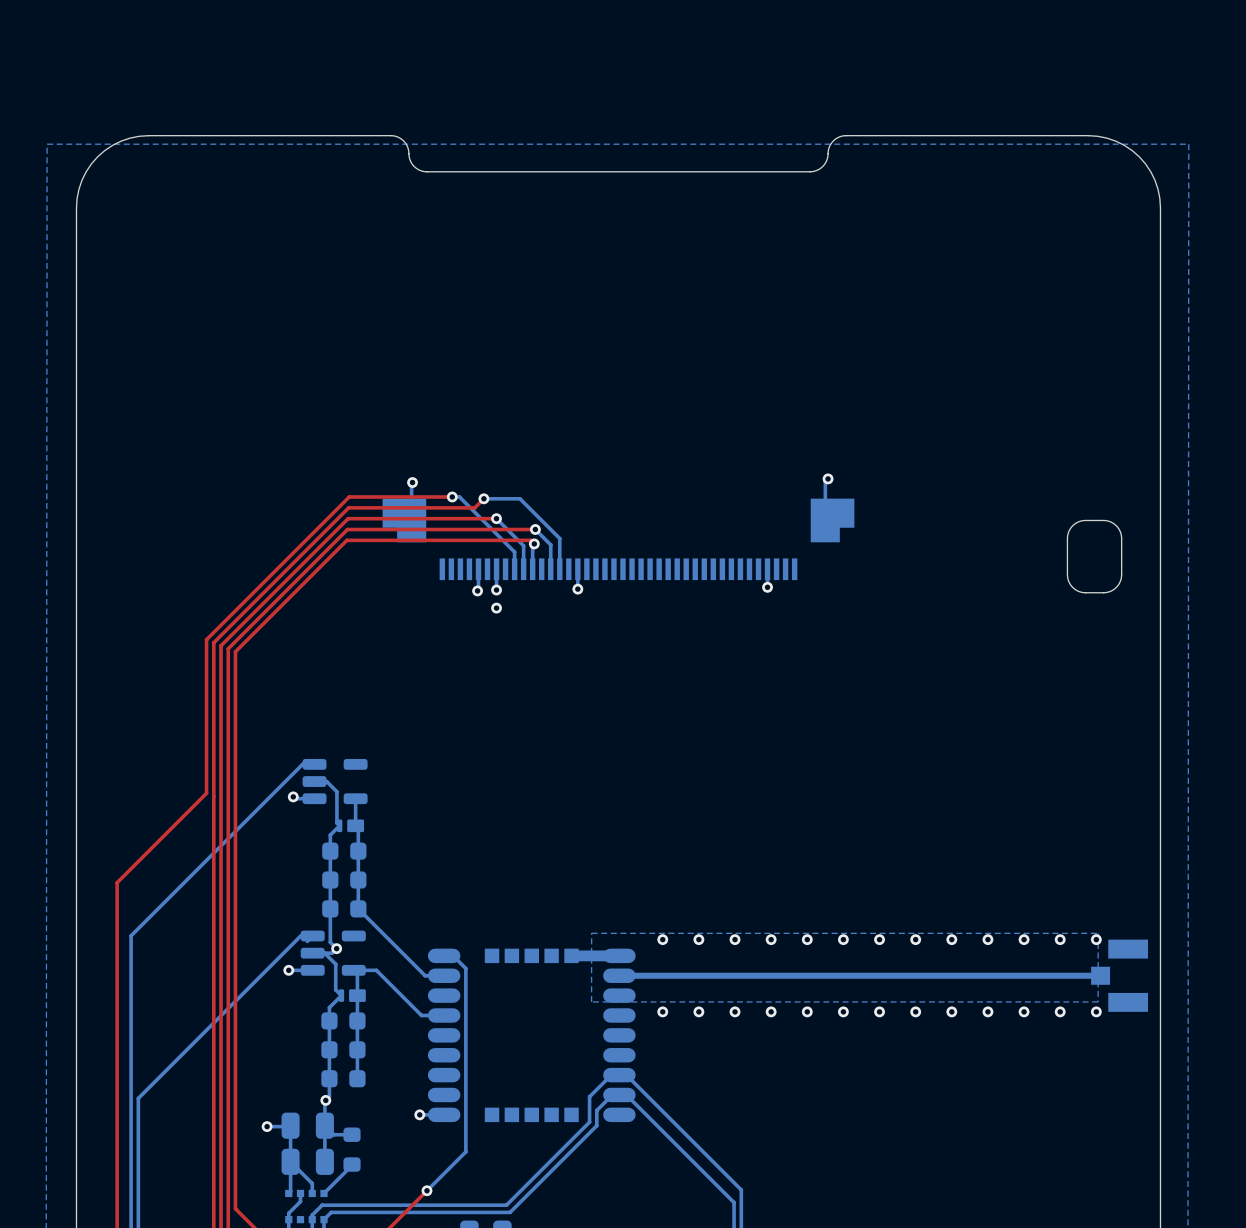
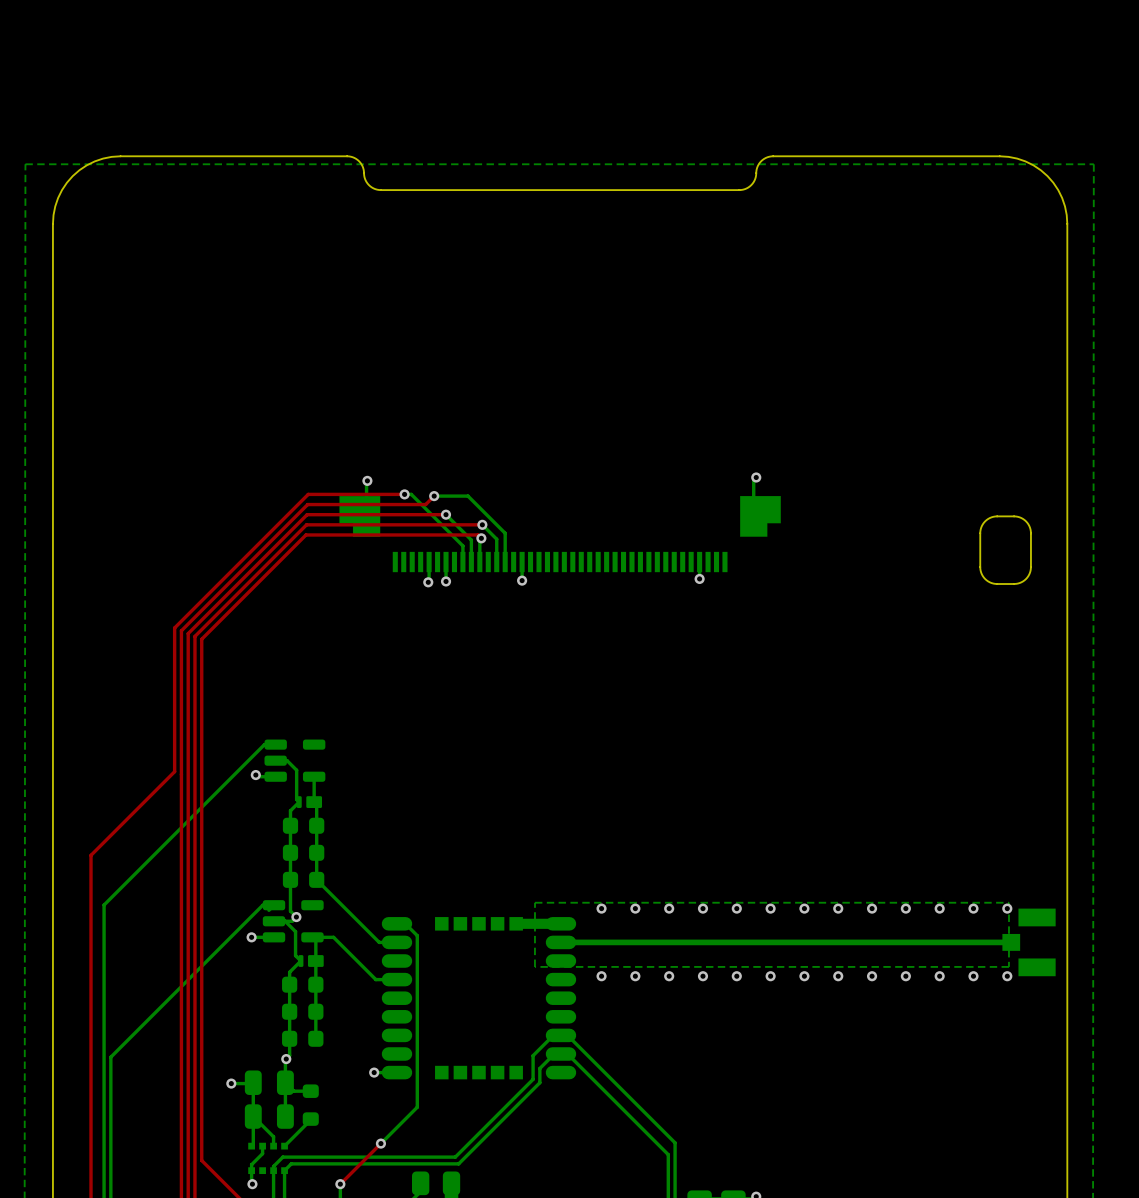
via: (496, 608) -> none

